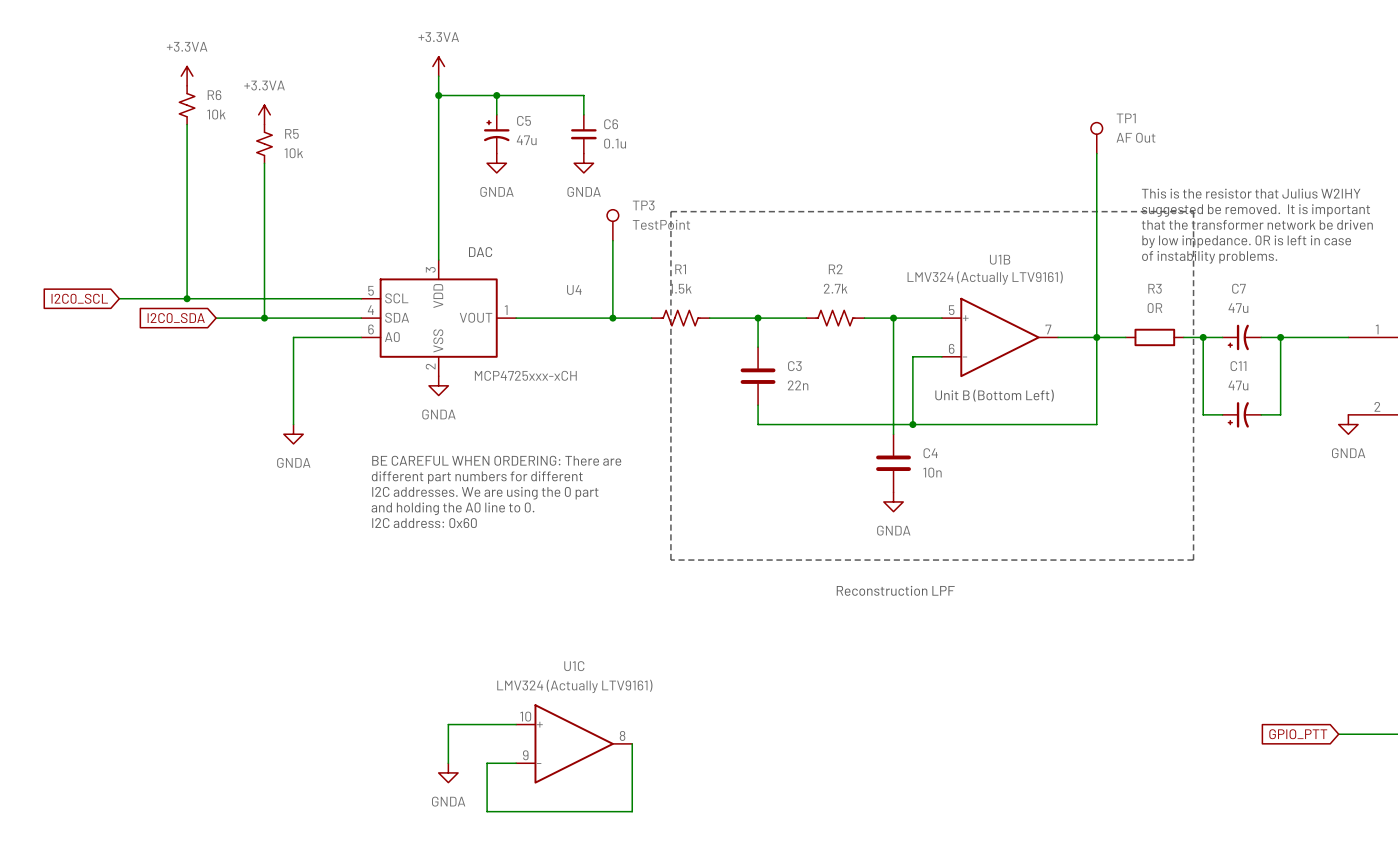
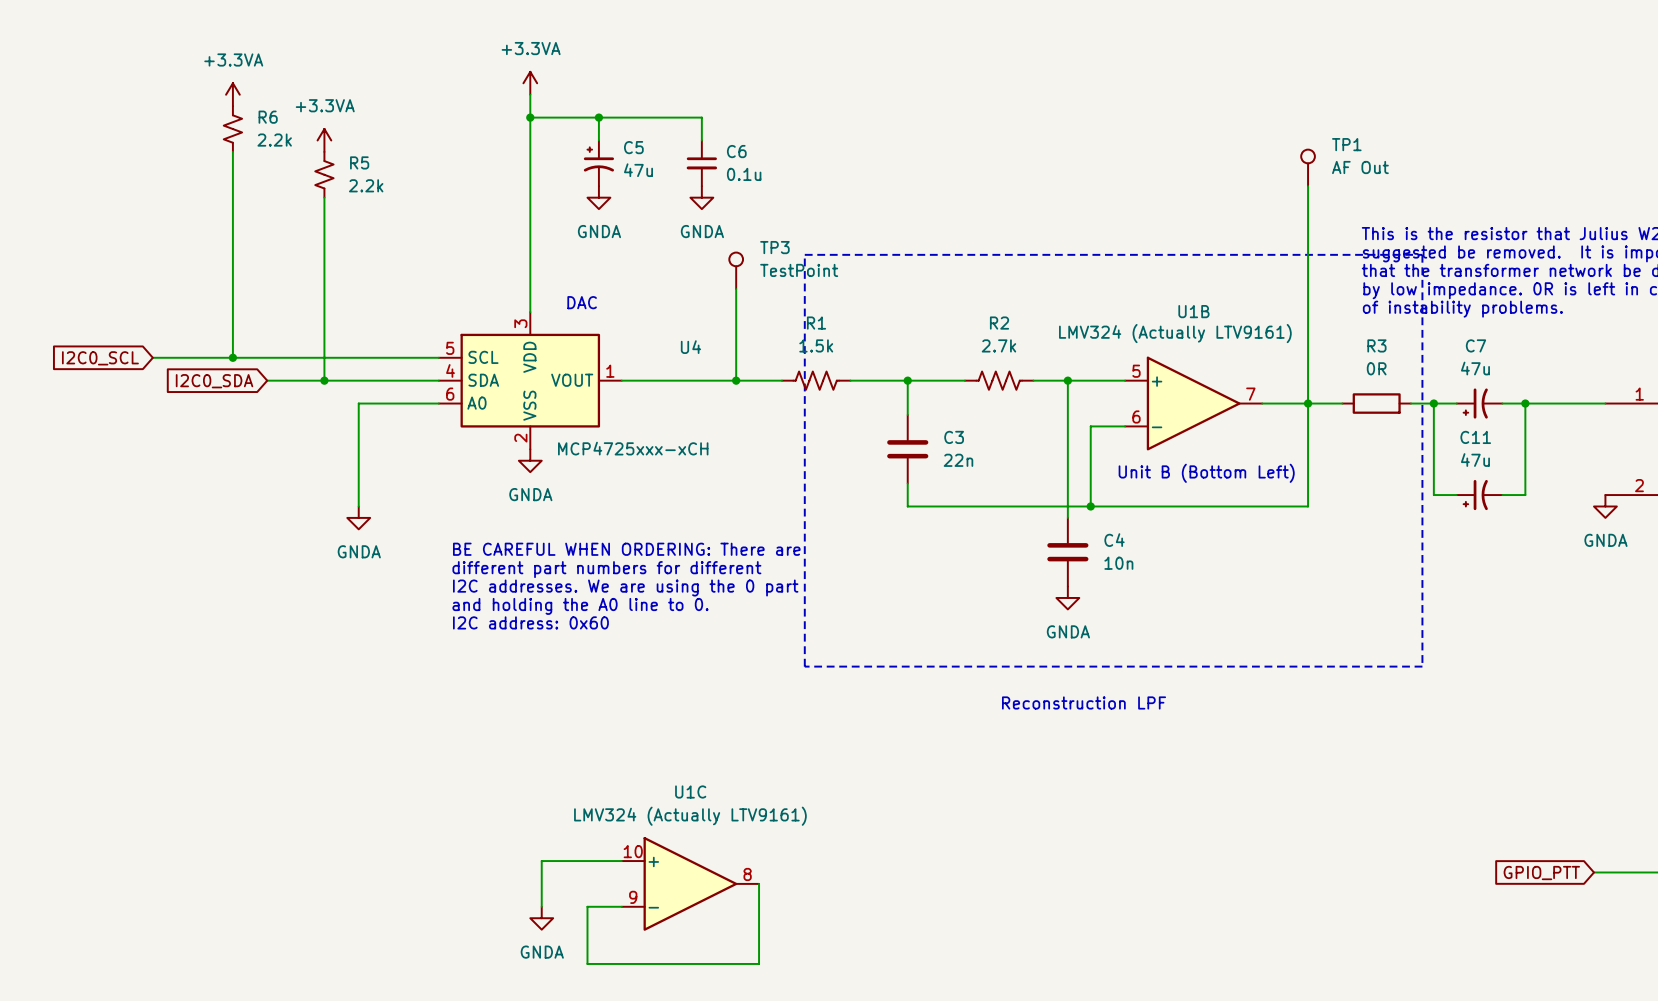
R6 value: 10k (216, 114) -> 2.2k (274, 140)
R5 value: 10k (293, 153) -> 2.2k (366, 185)

